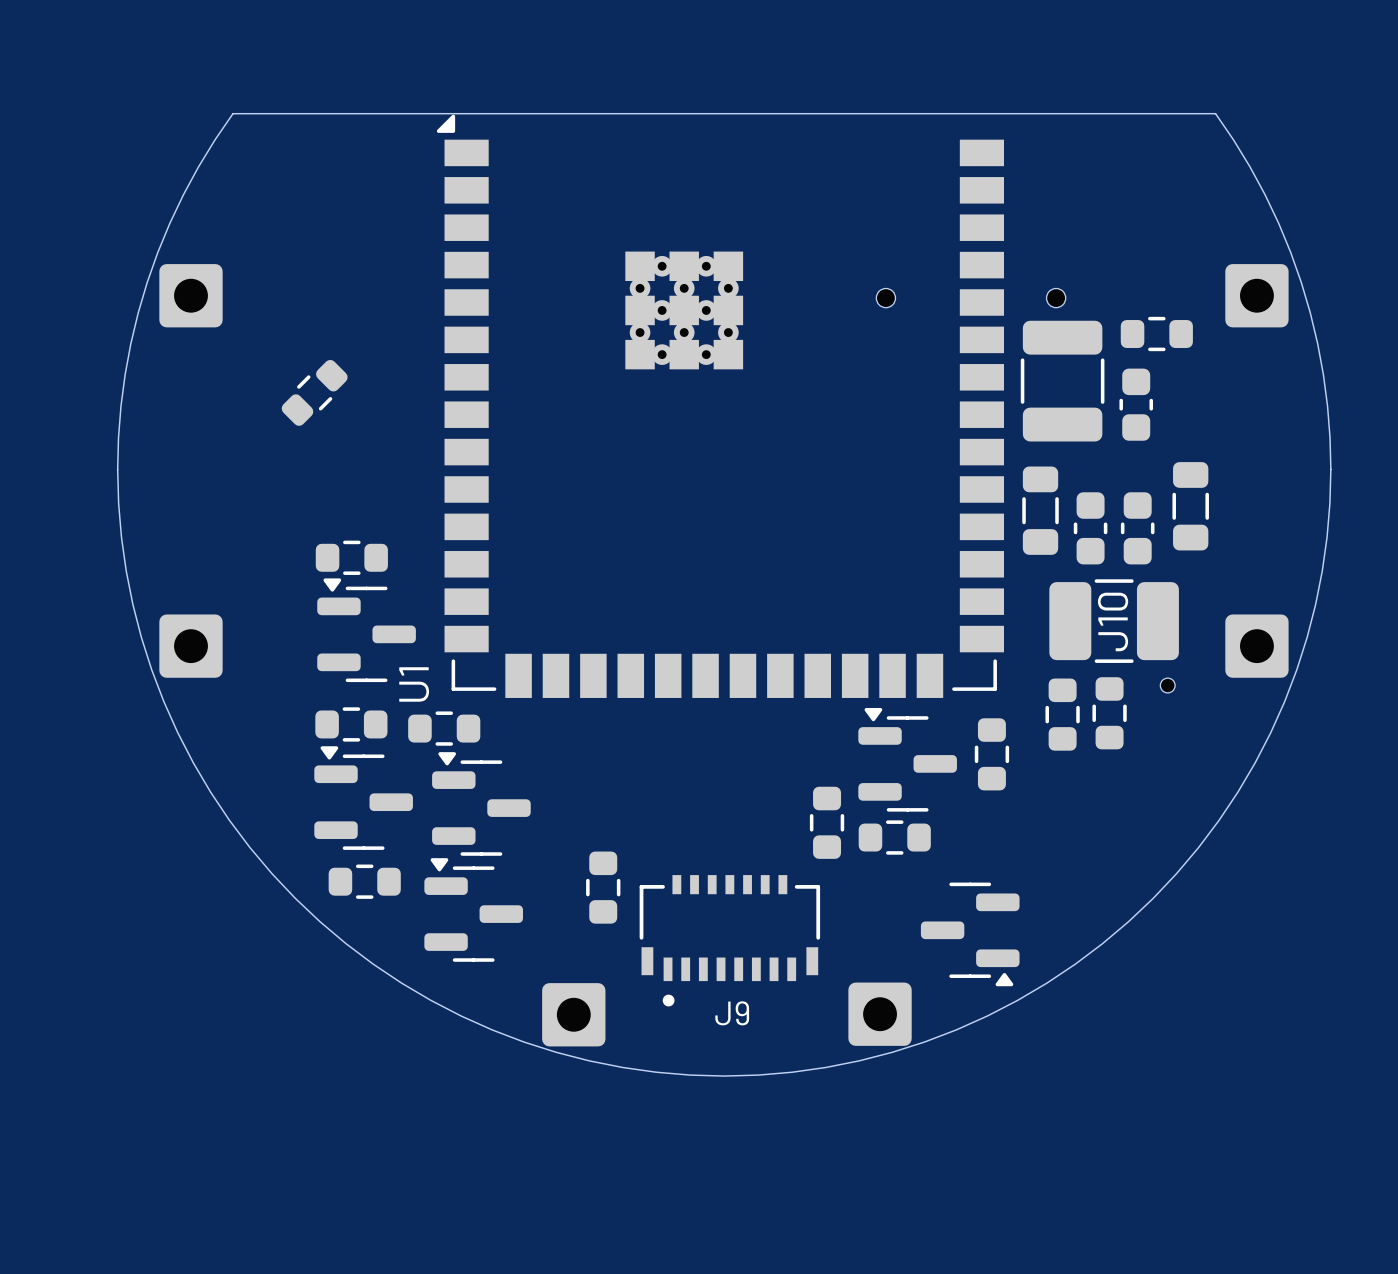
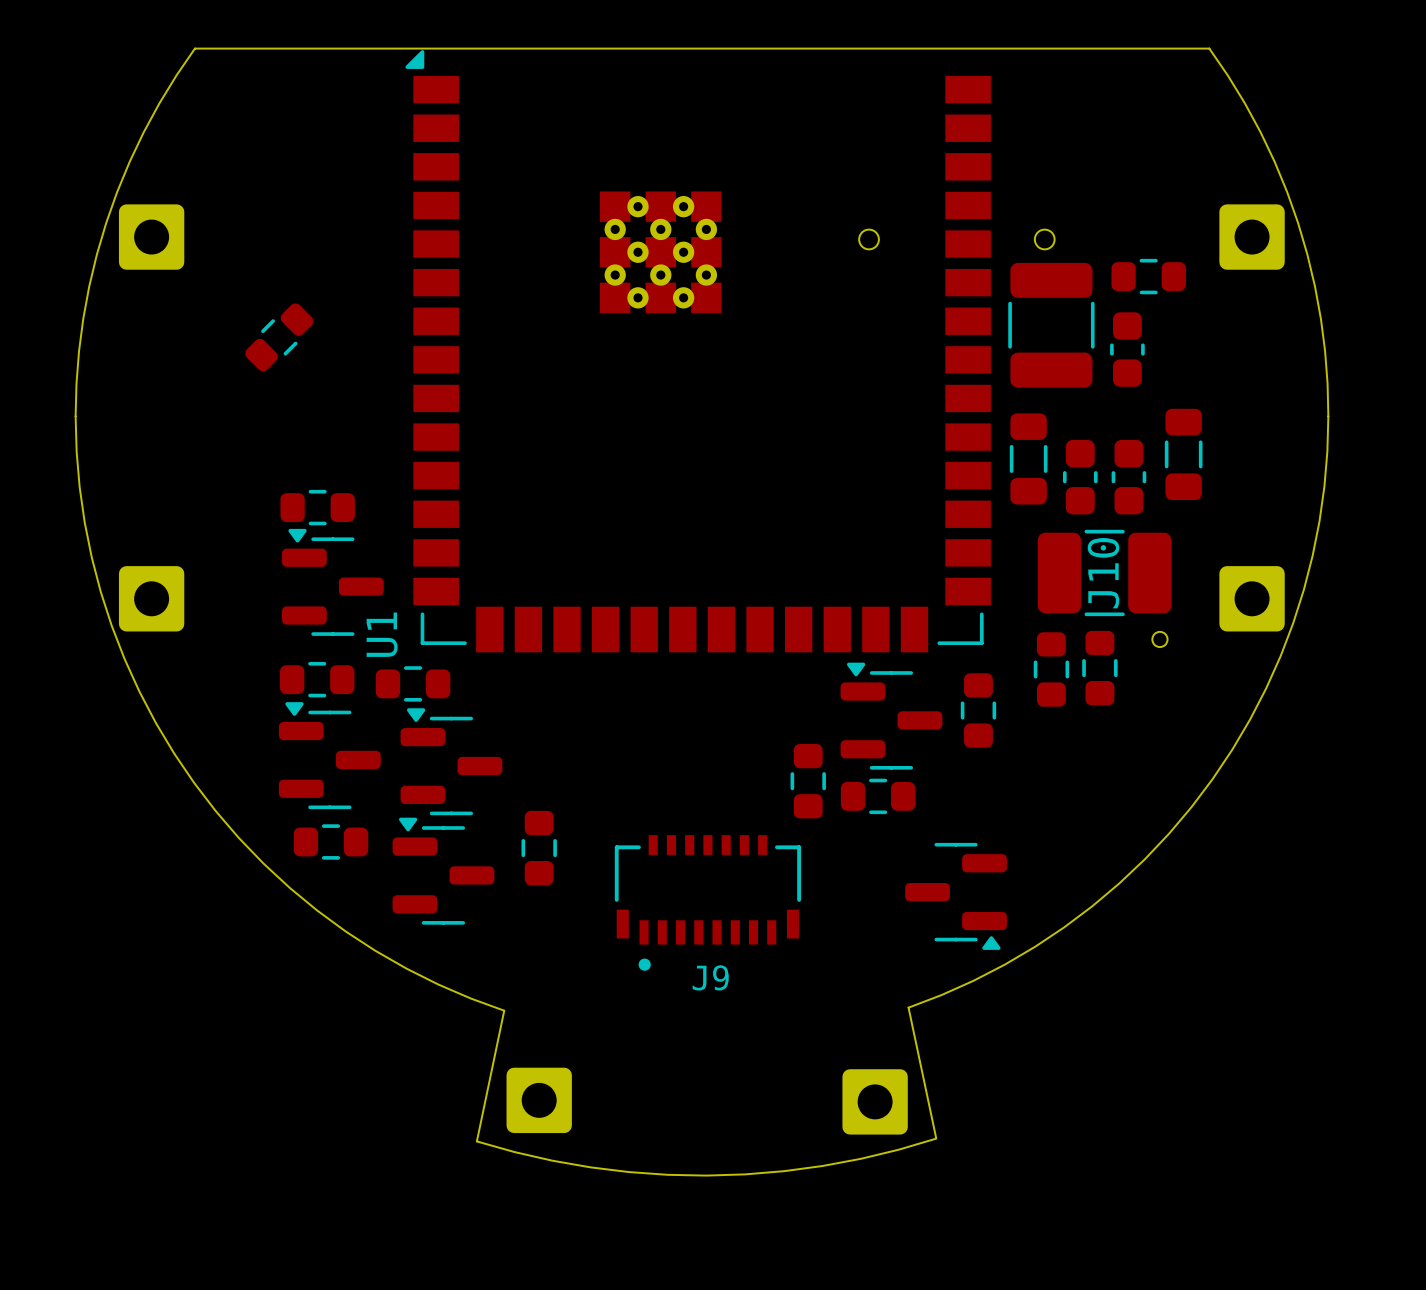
board edge: (232, 113) (1215, 113) (1249, 166) (1265, 194) (1290, 252) (1301, 282) (1310, 312) (1323, 374) (1327, 406) (1330, 469) (1327, 537) (1322, 571) (1307, 637) (1296, 669) (1270, 732) (1255, 762) (1218, 820) (1176, 873) (1153, 898) (1102, 943) (1046, 983) (1017, 1000) (956, 1029) (892, 1052) (825, 1067) (792, 1072) (724, 1076) (656, 1072) (589, 1060) (523, 1042) (461, 1015) (430, 1000) (373, 964) (320, 921) (295, 898) (250, 847) (210, 792) (193, 762) (163, 701) (141, 637) (126, 571) (121, 537) (117, 469) (120, 406) (130, 343) (147, 282) (169, 223) (198, 166) (232, 113) -> (936, 1138) (860, 1158) (822, 1165) (784, 1171) (706, 1175) (667, 1174) (590, 1167) (552, 1160) (476, 1141) (504, 1010) (438, 984) (375, 950) (345, 931) (289, 887) (263, 863) (215, 810) (194, 782) (174, 753) (139, 691) (111, 625) (100, 591) (84, 522) (79, 487) (75, 416) (79, 351) (83, 318) (89, 286) (106, 223) (117, 192) (143, 132) (159, 103) (194, 48) (1209, 48) (1227, 75) (1260, 132) (1287, 192) (1307, 254) (1320, 318) (1327, 383) (1327, 451) (1319, 521) (1303, 589) (1280, 656) (1250, 719) (1212, 778) (1168, 833) (1119, 883) (1064, 927) (1004, 964) (973, 980) (908, 1007) (936, 1138)
part position: (603, 887) -> (539, 848)
part position: (573, 1014) -> (539, 1100)
part position: (880, 1014) -> (875, 1101)

